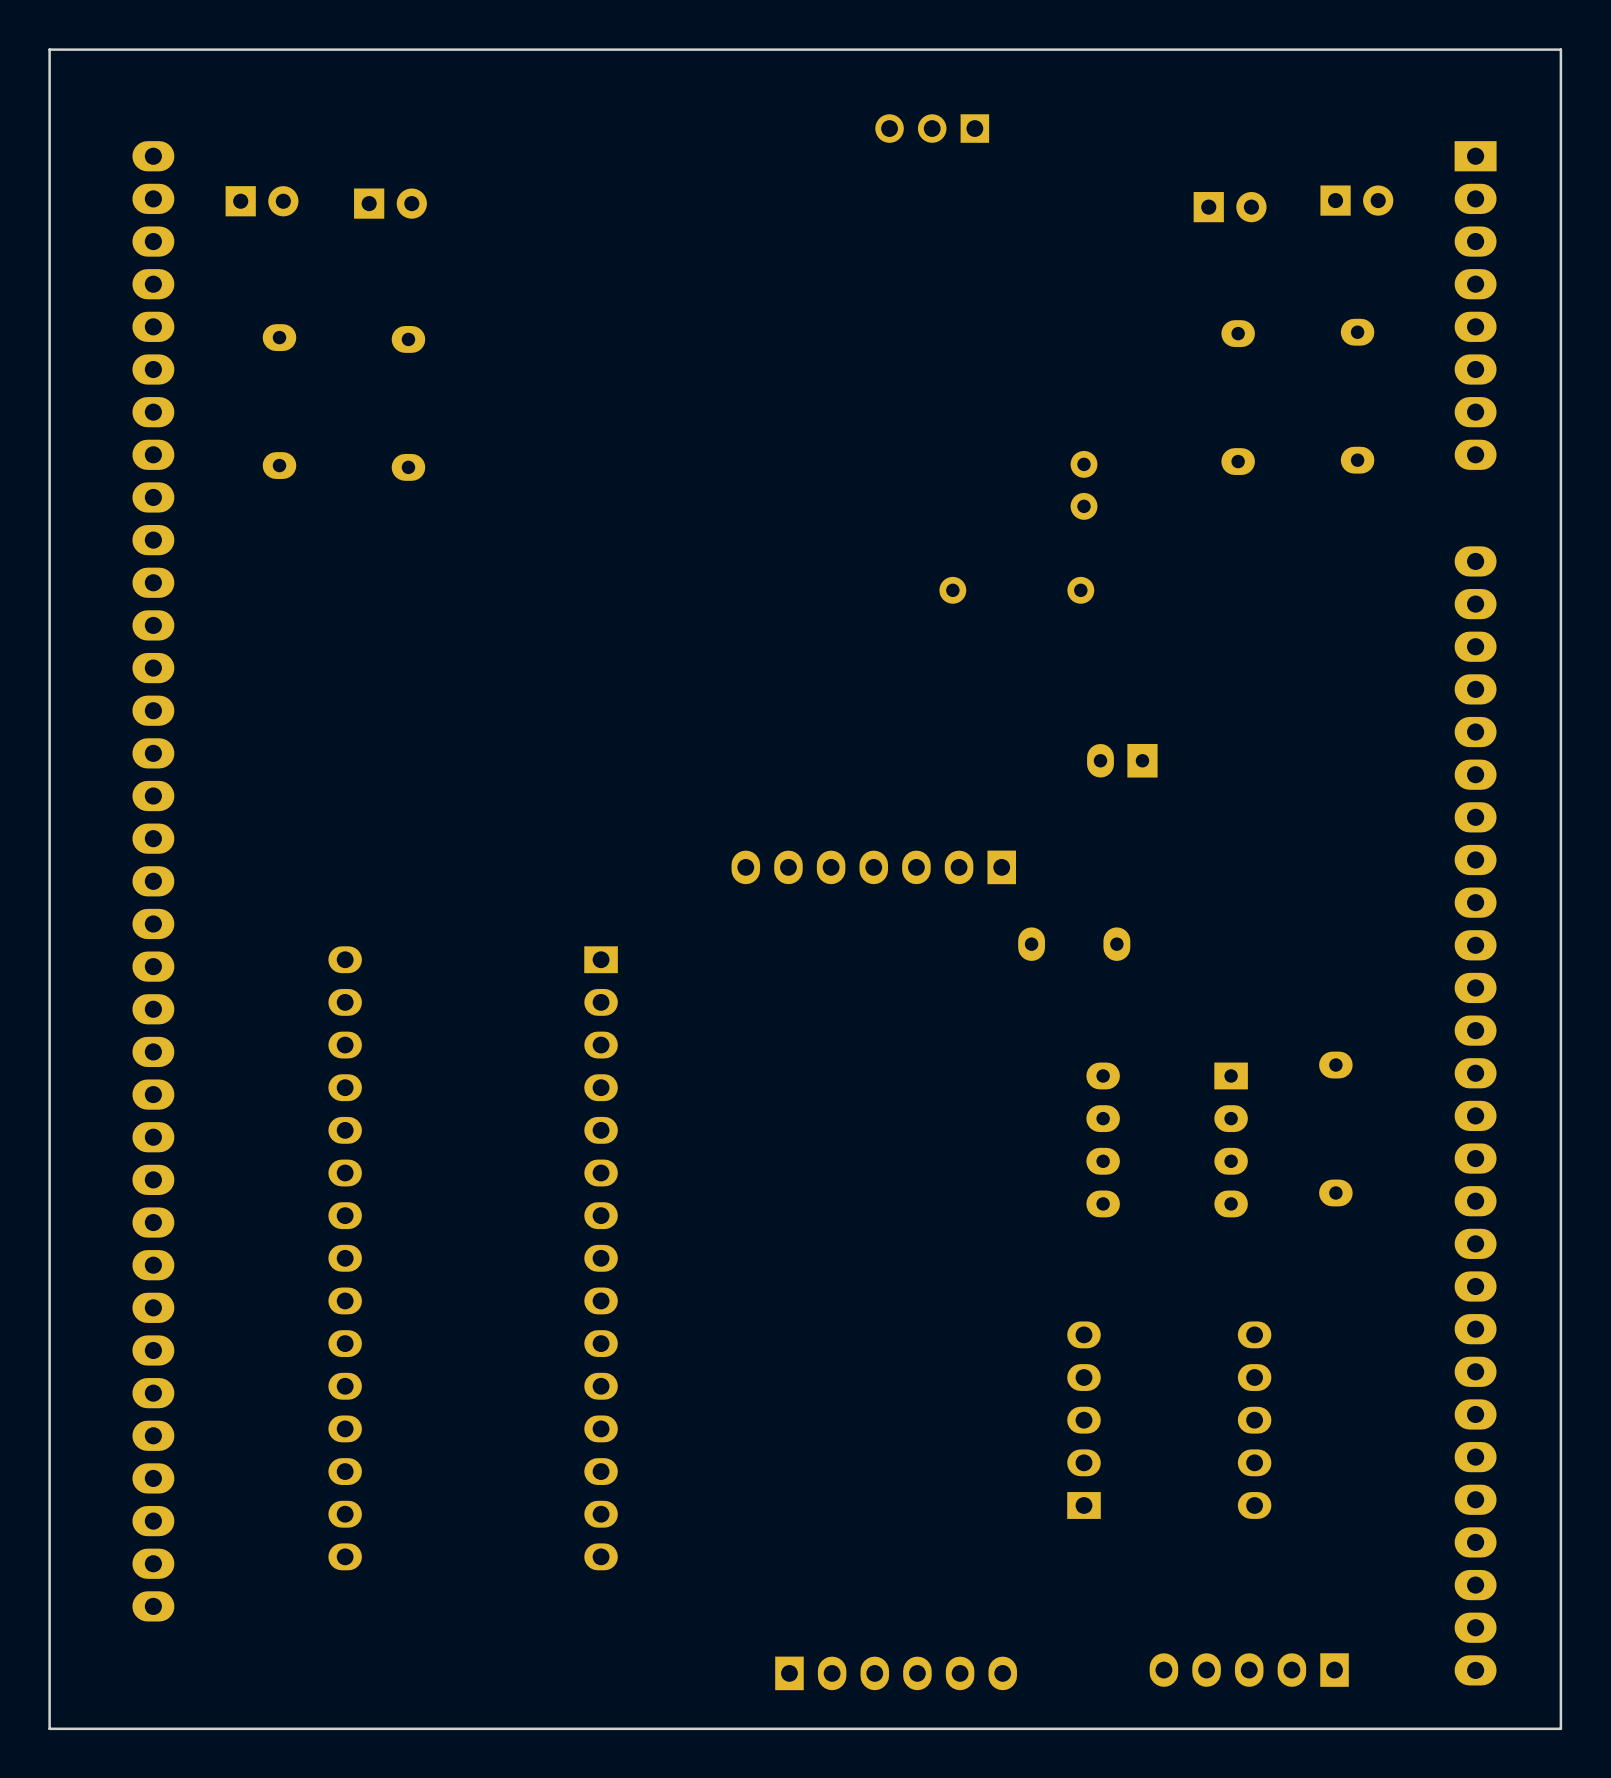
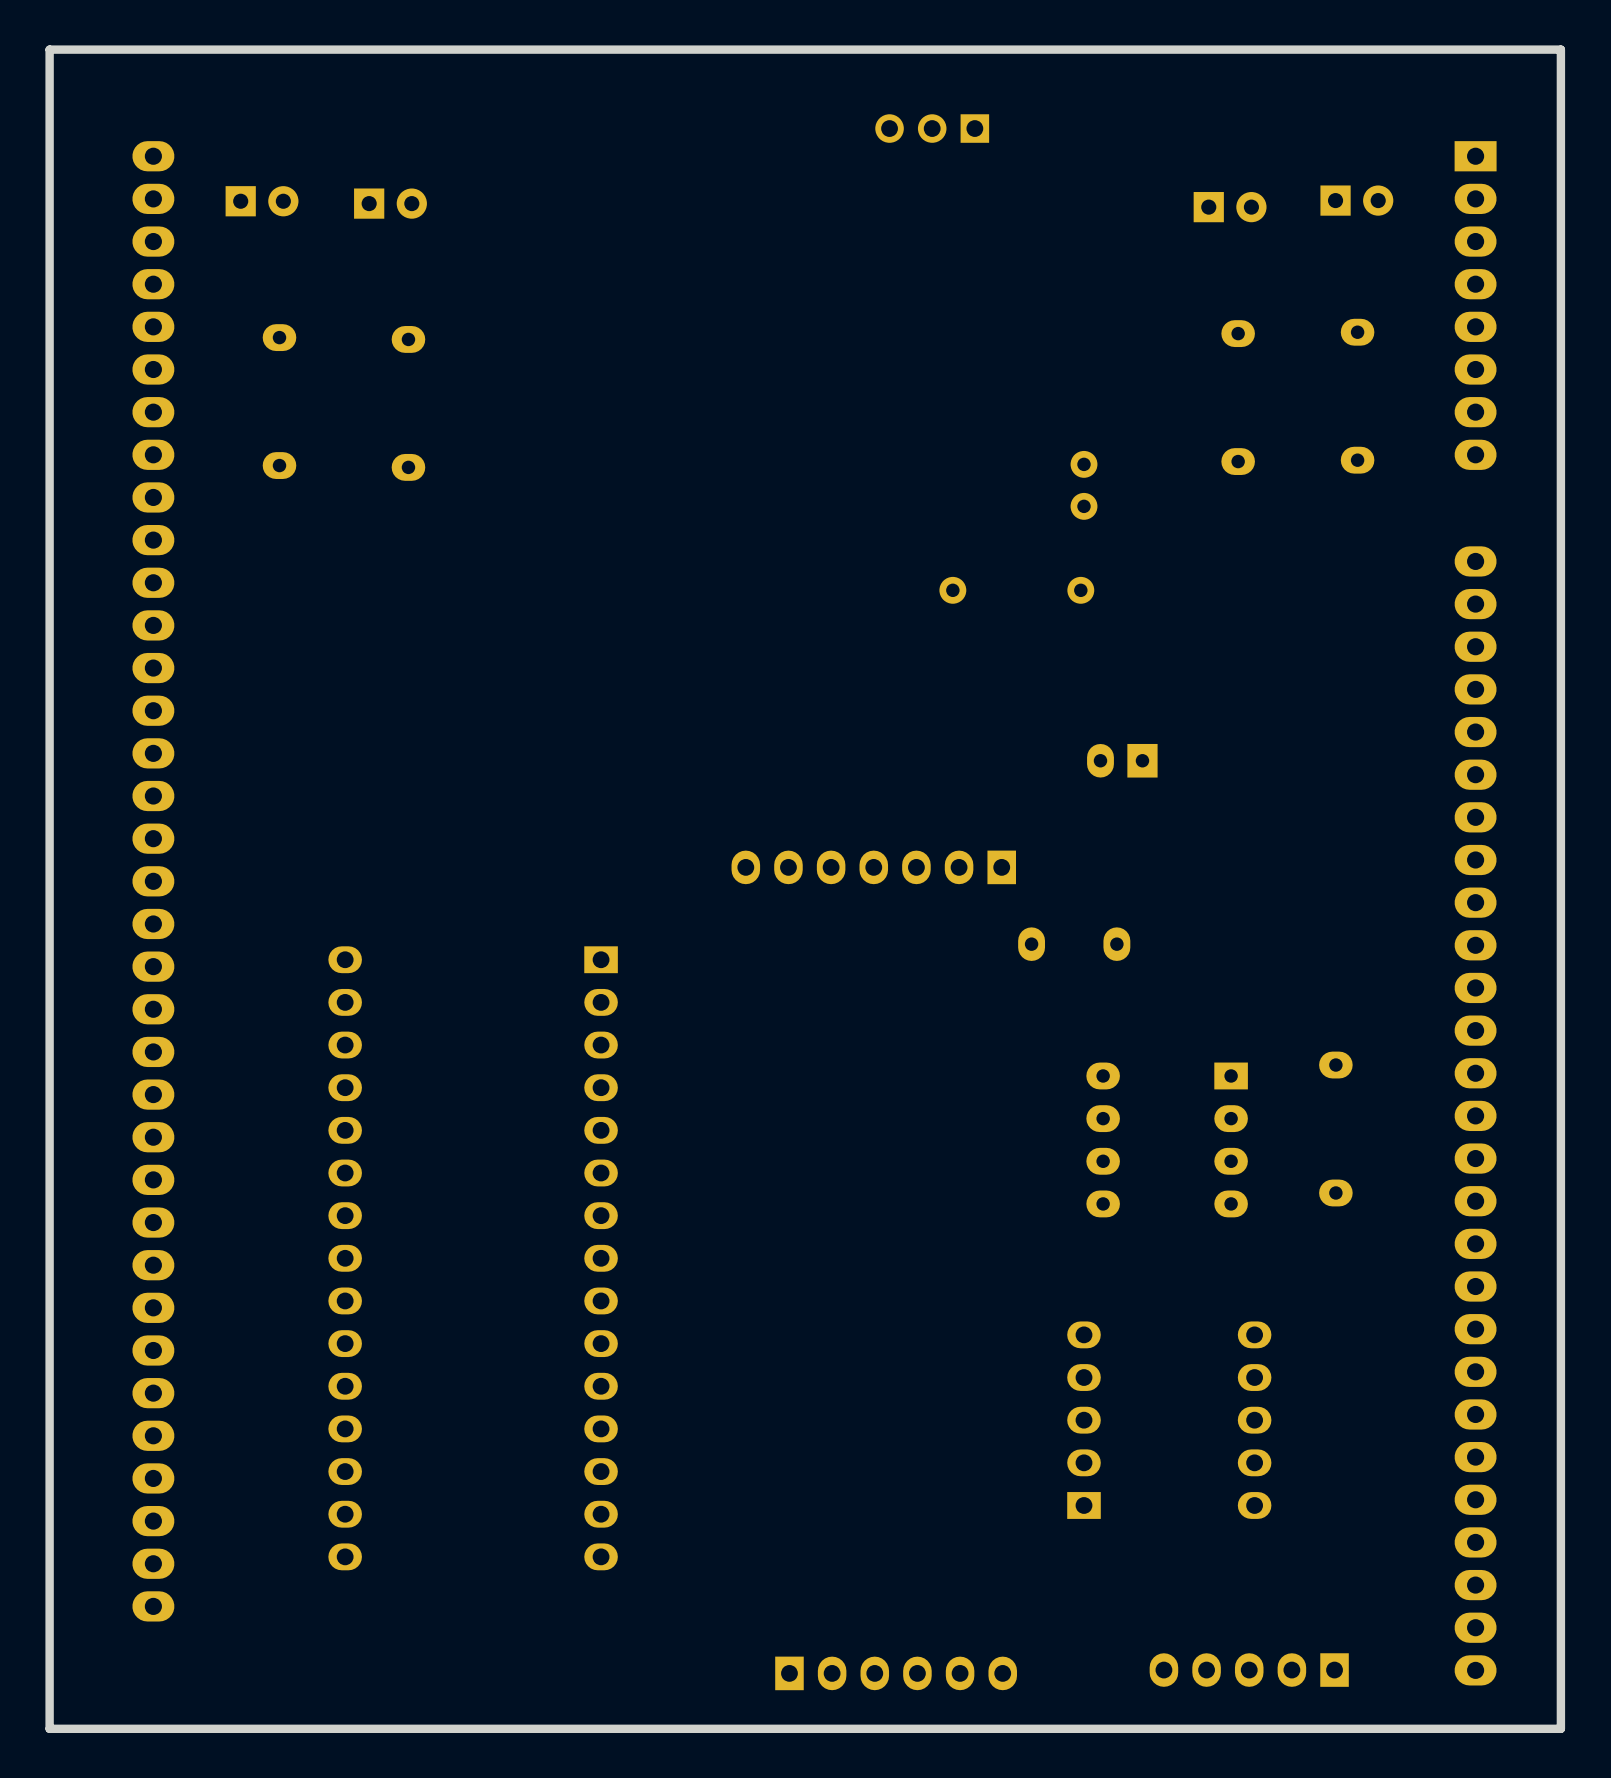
board edge width: thin (1560, 49) (49, 49) (49, 1728) (1560, 1728) (1560, 49) -> thick (1560, 49) (49, 49) (49, 1728) (1560, 1728) (1560, 49)

